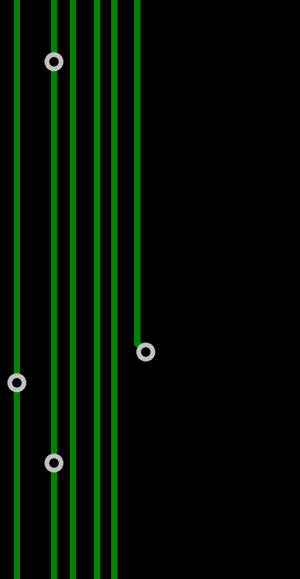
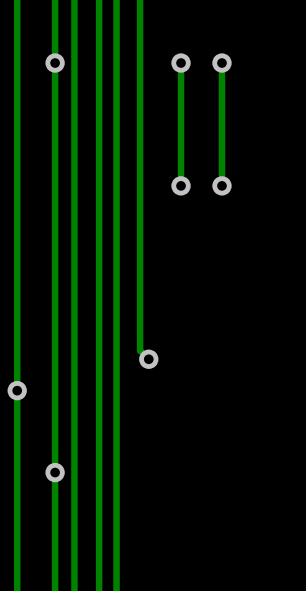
track: none -> (181, 63) (181, 185)
via: none -> (181, 63)
track: none -> (221, 63) (221, 185)
via: none -> (221, 63)
via: none -> (181, 185)
via: none -> (221, 185)

